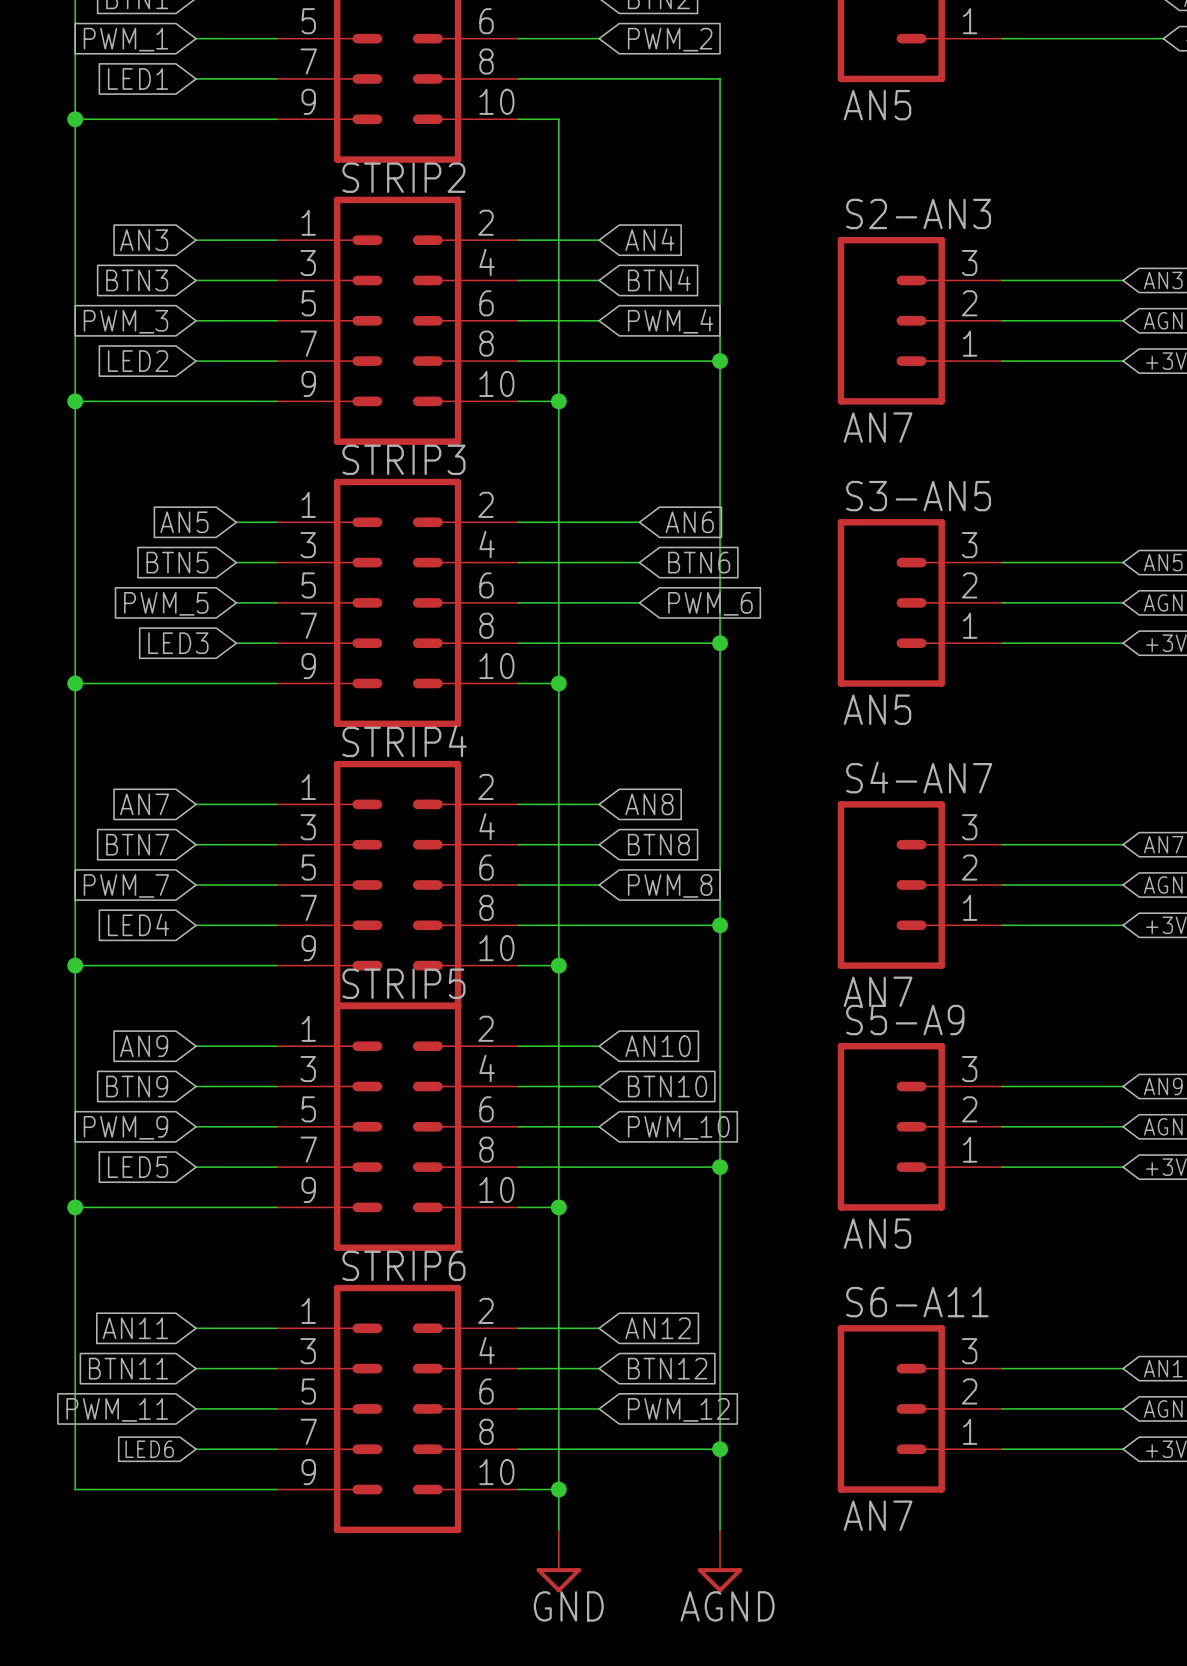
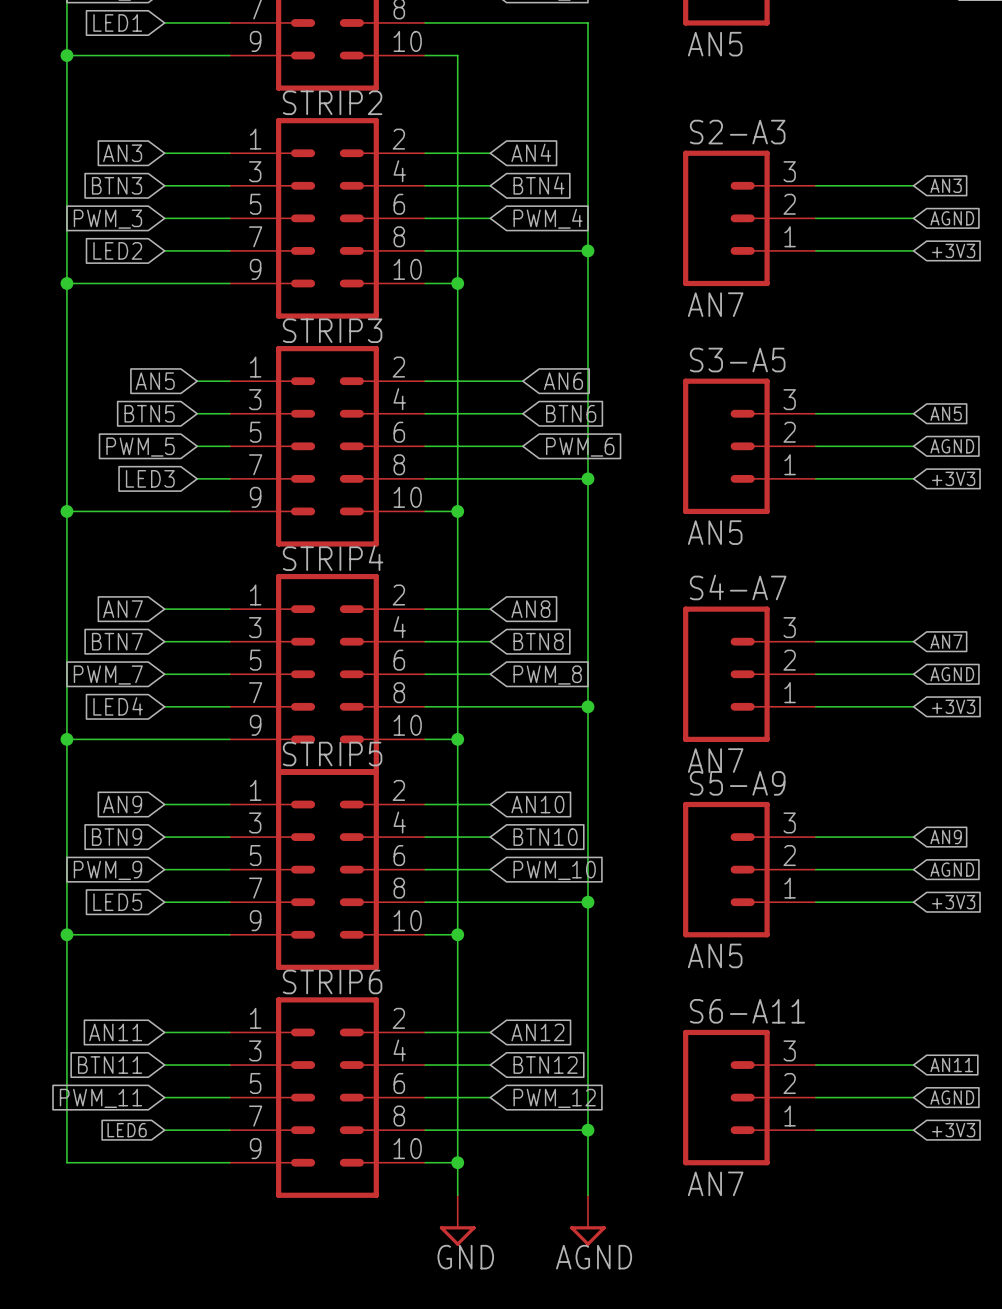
S2-AN3 name: S2-AN3 (918, 213) -> S2-A3 (737, 132)
S3-AN5 name: S3-AN5 (918, 496) -> S3-A5 (737, 360)
S4-AN7 name: S4-AN7 (919, 777) -> S4-A7 (738, 587)

